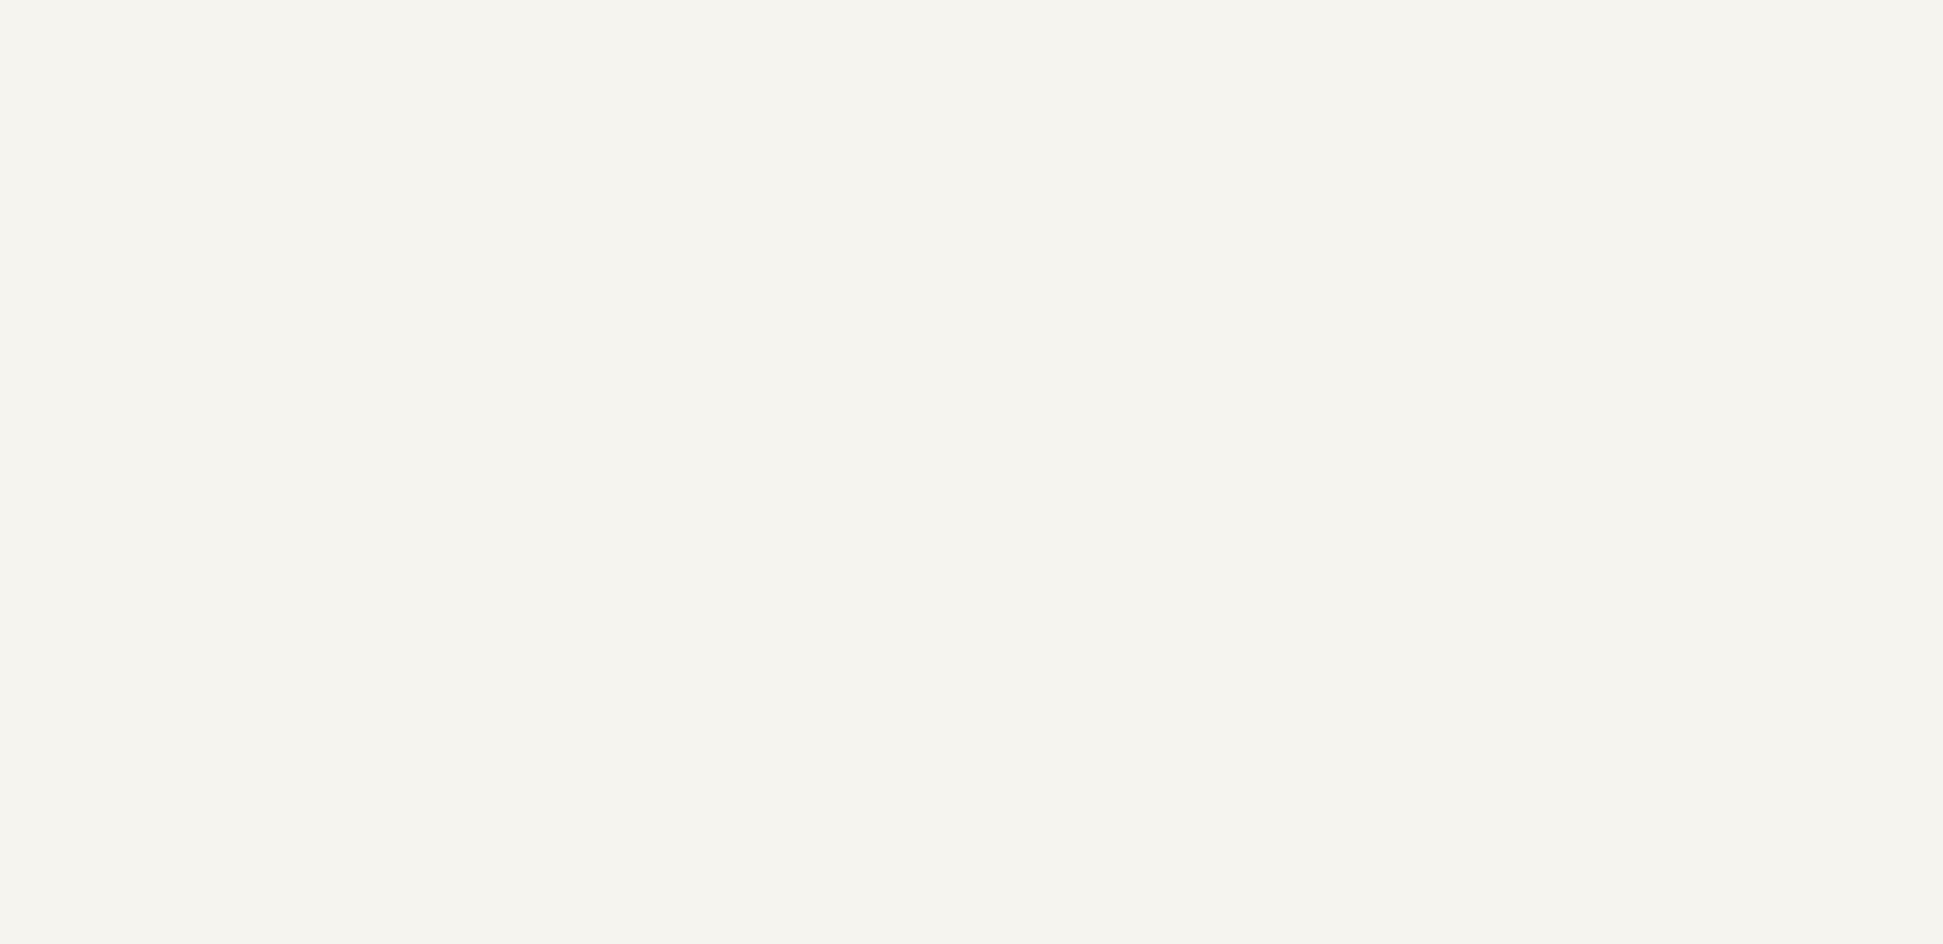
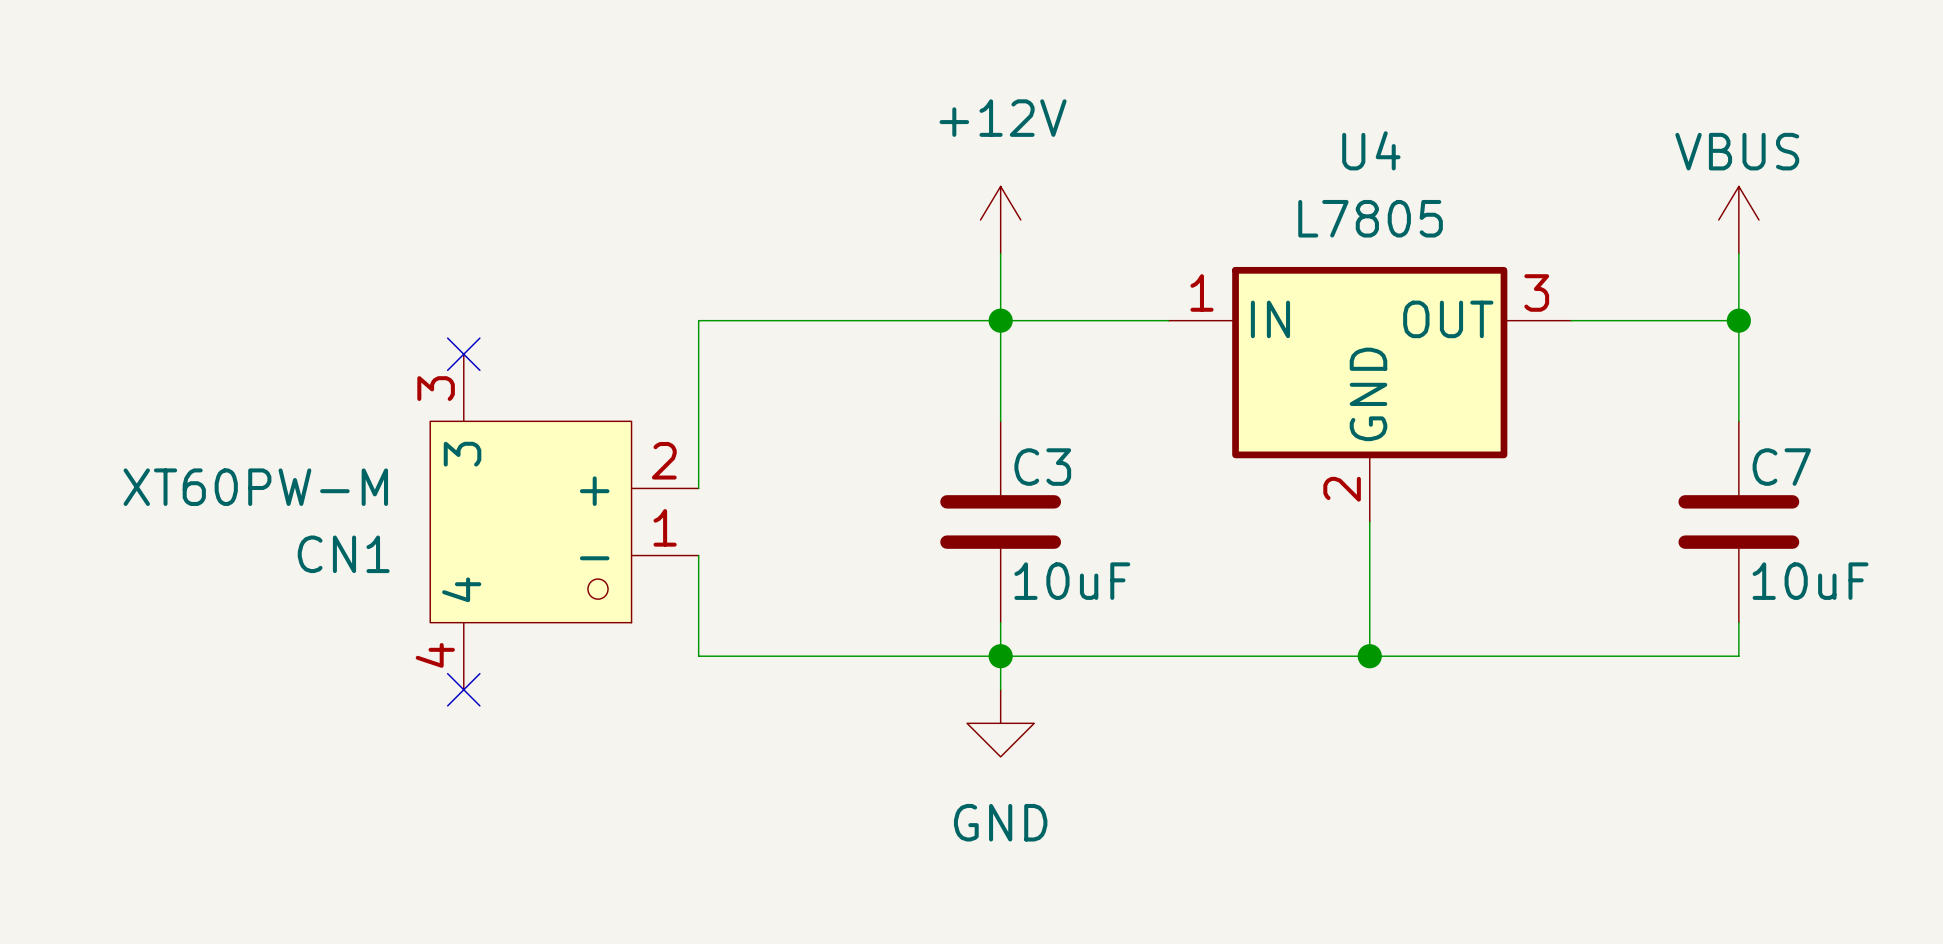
power symbol: none -> +12V (1000, 220)
power symbol: none -> VBUS (1738, 220)
wire: none -> (1000, 253) (1000, 421)
wire: none -> (1738, 253) (1738, 421)
junction: none -> (1000, 320)
wire: none -> (1168, 320) (698, 320) (698, 488)
wire: none -> (1571, 320) (1738, 320)
junction: none -> (1738, 320)
no-connect mark: none -> (463, 354)
U4: none -> L7805 (1369, 394)
CN1: none -> XT60PW-M (564, 521)
C3: none -> 10uF (1000, 521)
wire: none -> (1369, 521) (1369, 656)
C7: none -> 10uF (1738, 521)
wire: none -> (698, 555) (698, 656) (1738, 656) (1738, 622)
wire: none -> (1000, 622) (1000, 689)
junction: none -> (1000, 656)
junction: none -> (1369, 656)
no-connect mark: none -> (463, 689)
power symbol: none -> GND (1000, 723)

